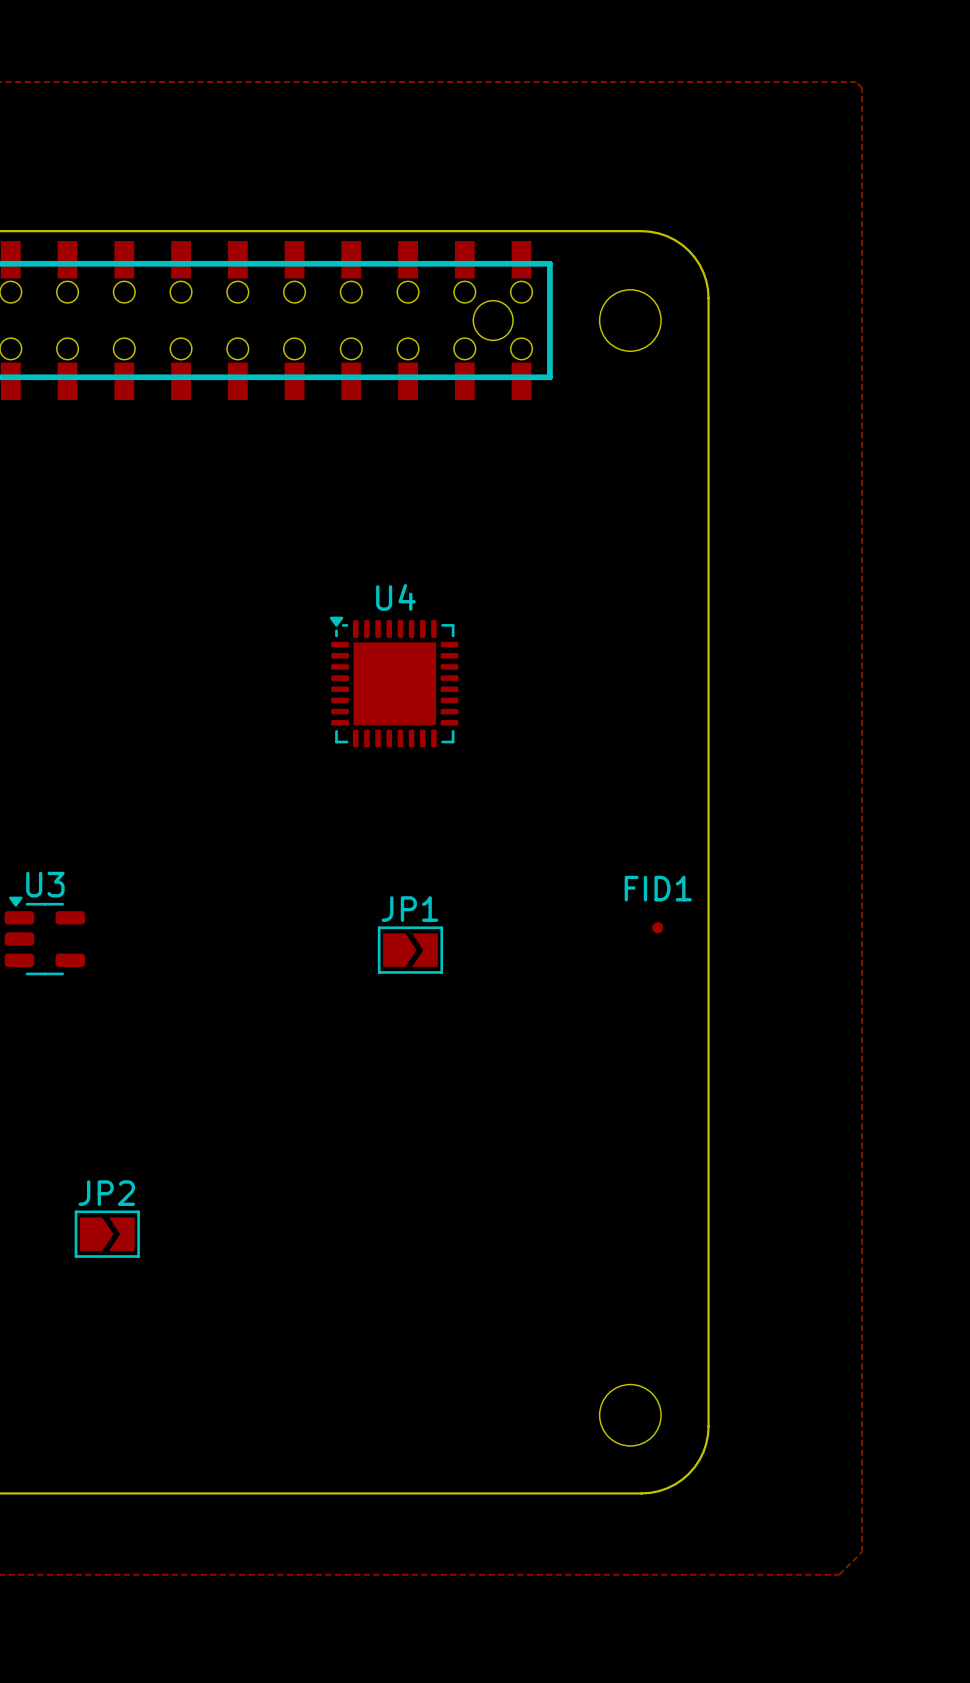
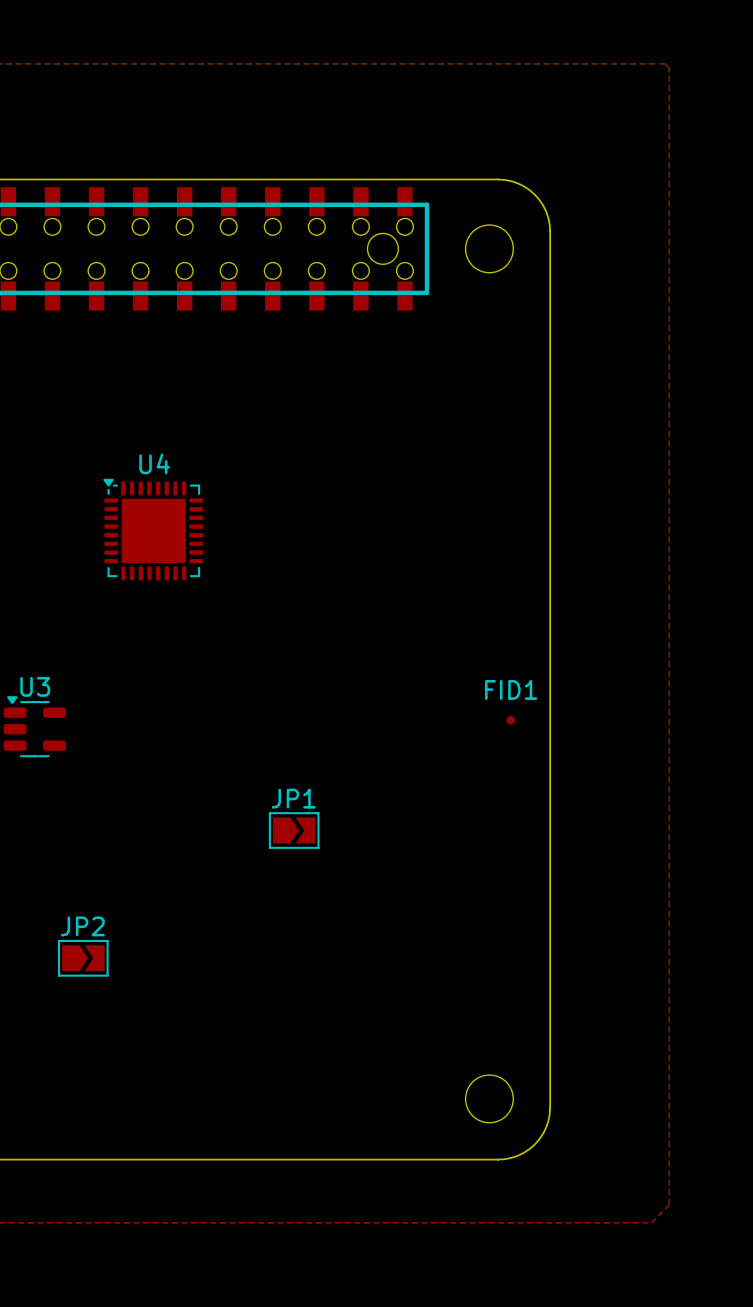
U4 position: (394, 682) -> (153, 529)
JP1 position: (410, 950) -> (294, 830)

